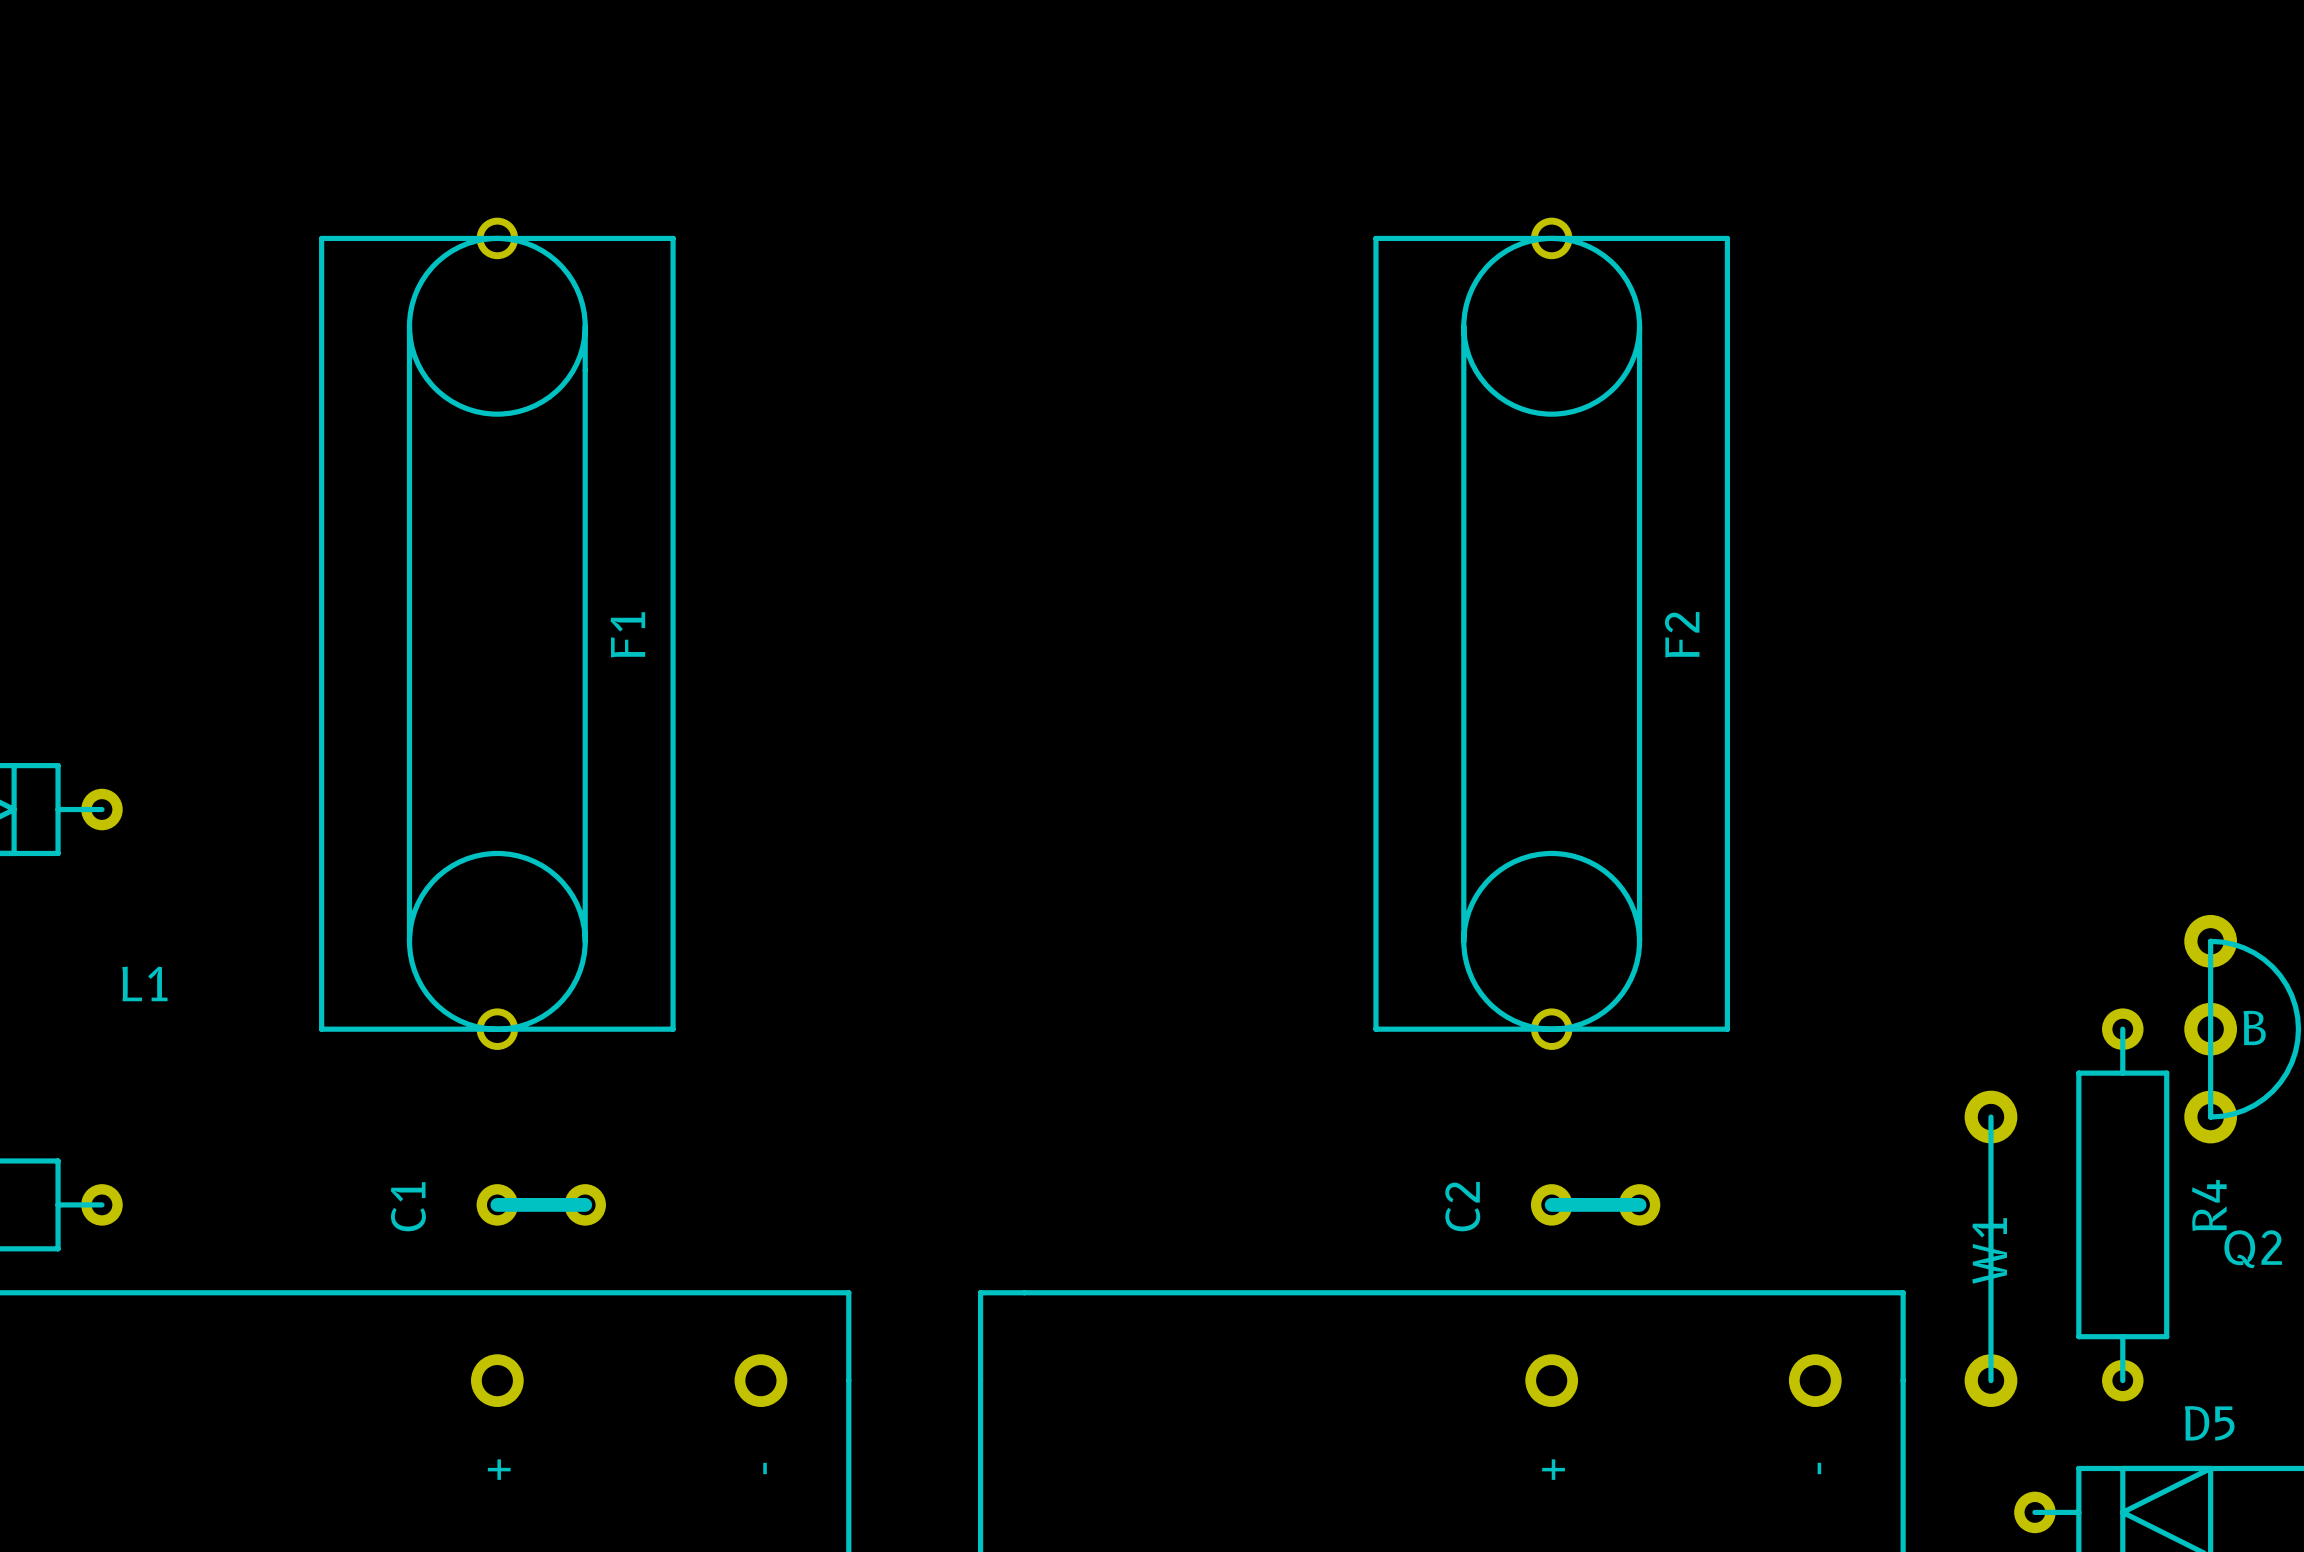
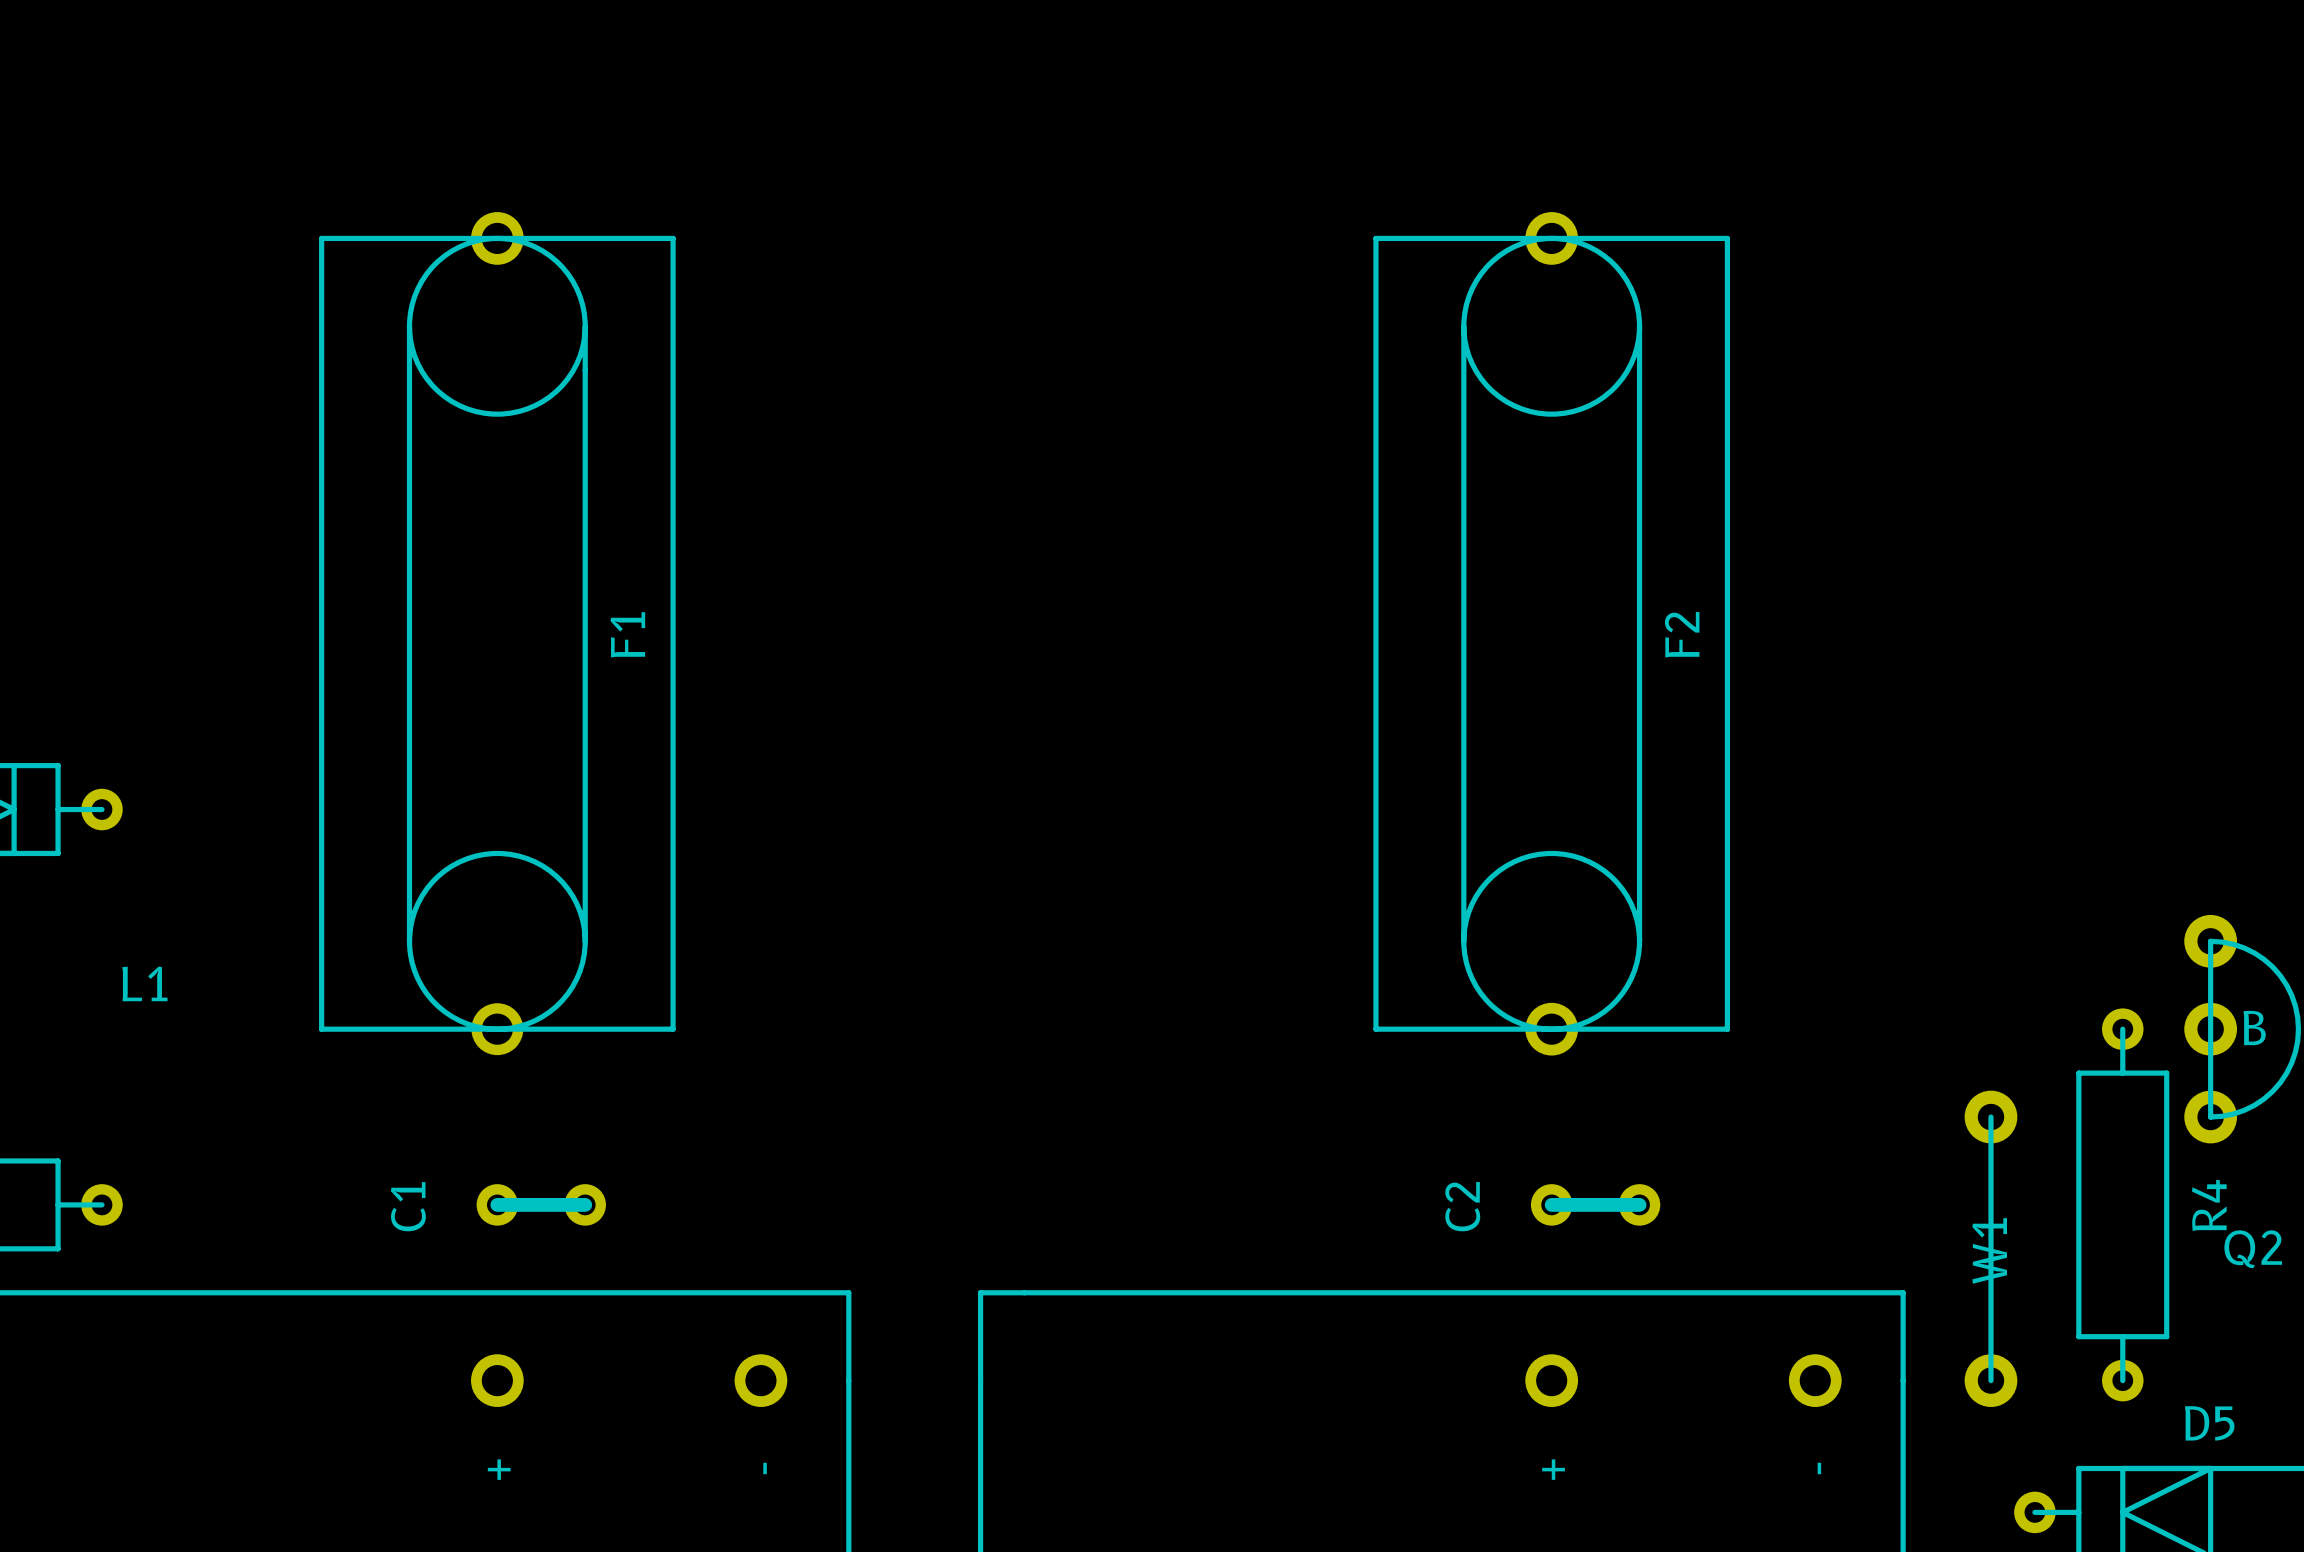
F1 footprint: [319, 217, 676, 1050] -> [319, 212, 676, 1056]
F2 footprint: [1373, 217, 1731, 1050] -> [1373, 212, 1731, 1056]

